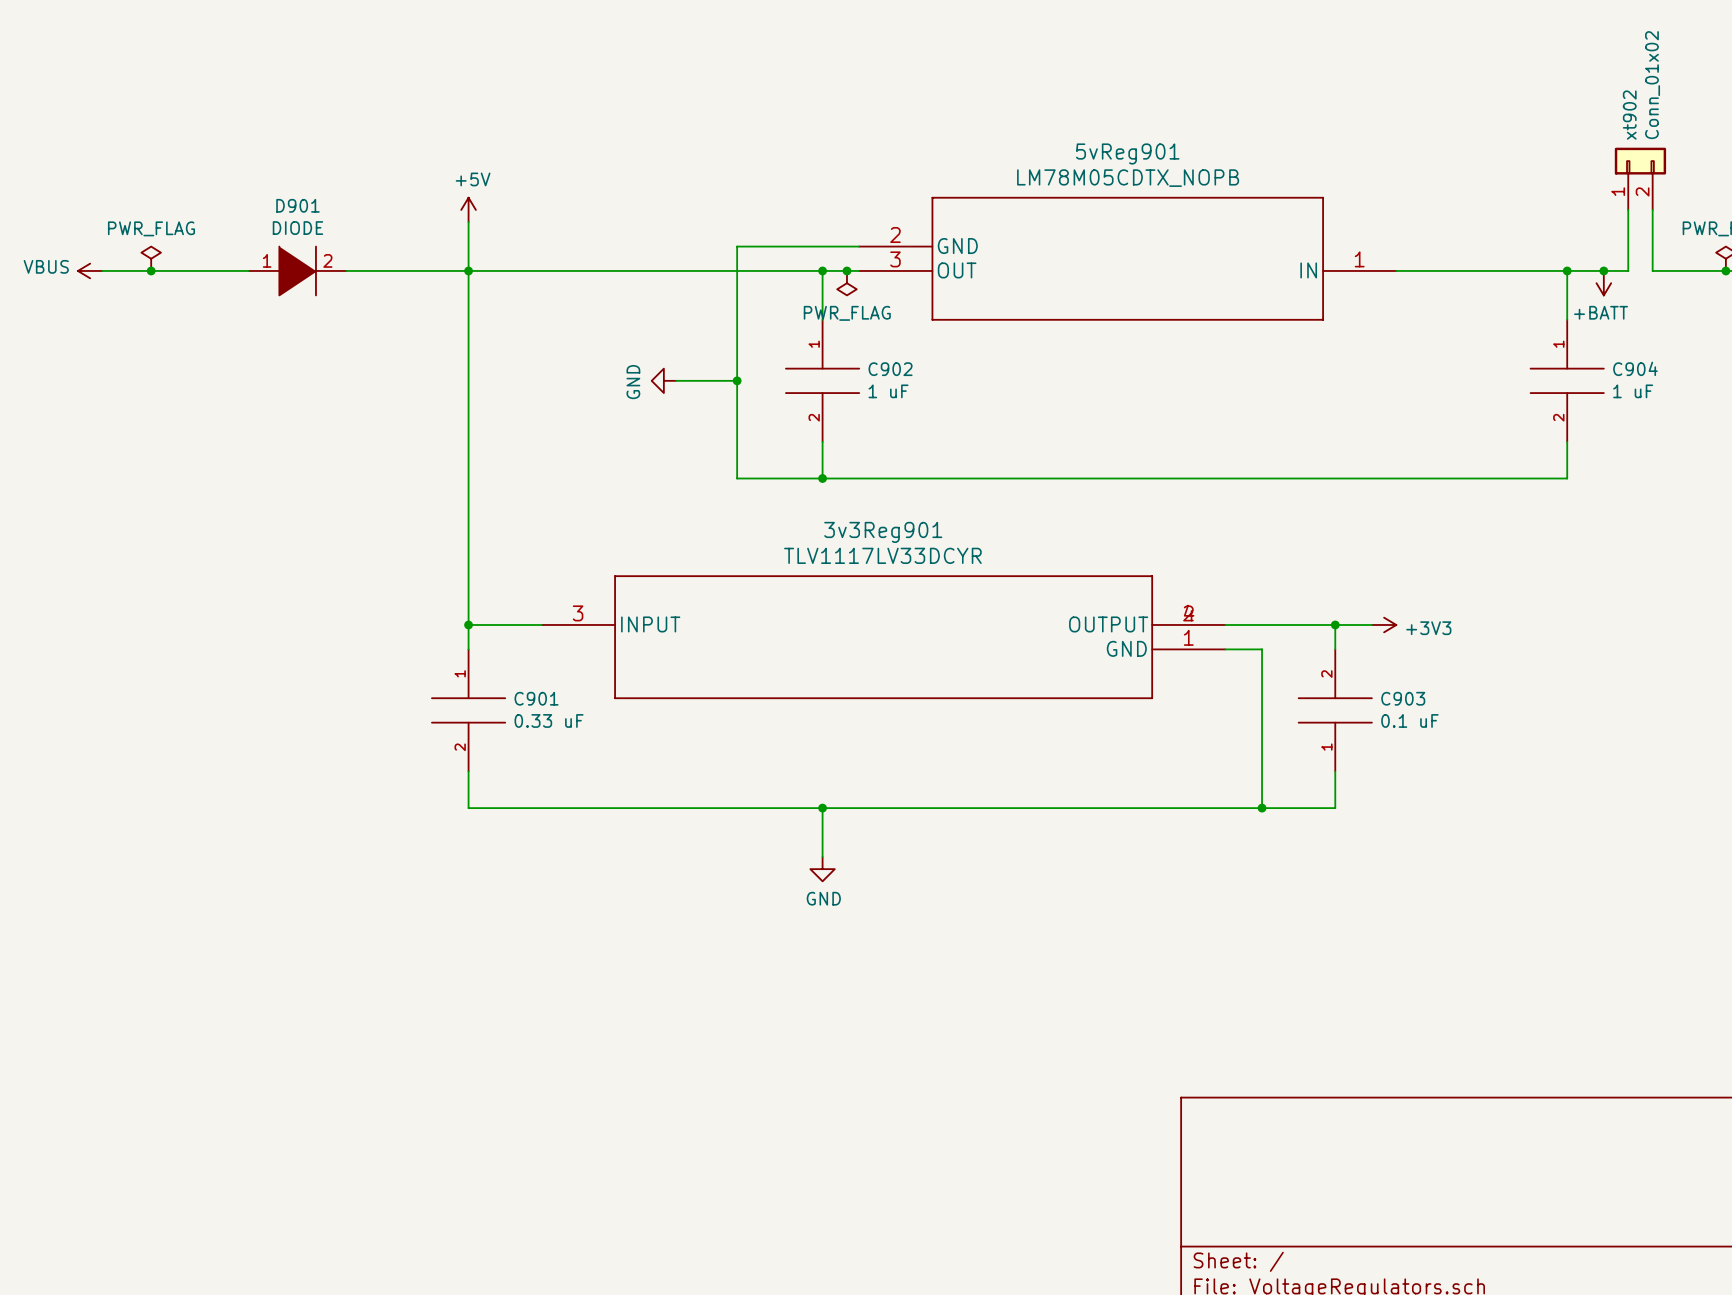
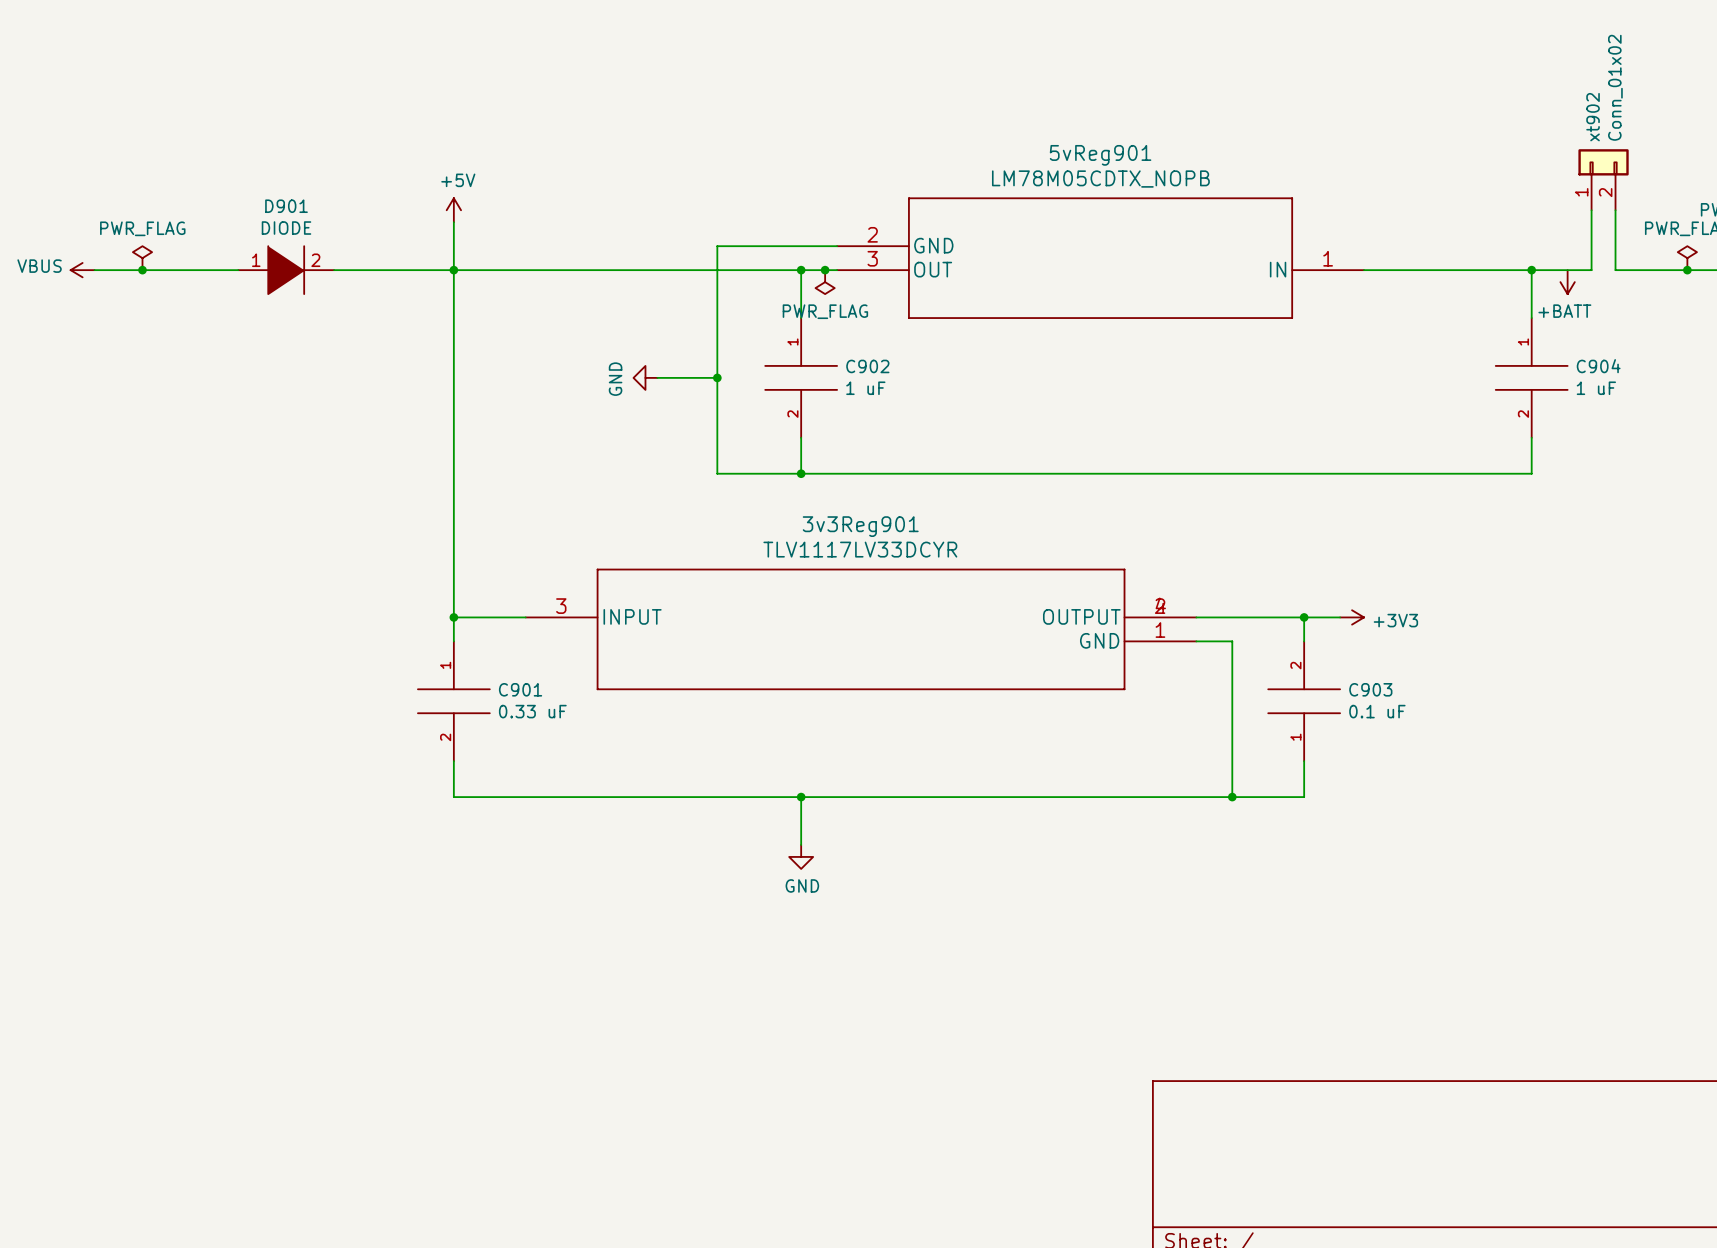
junction: (1603, 270) -> none

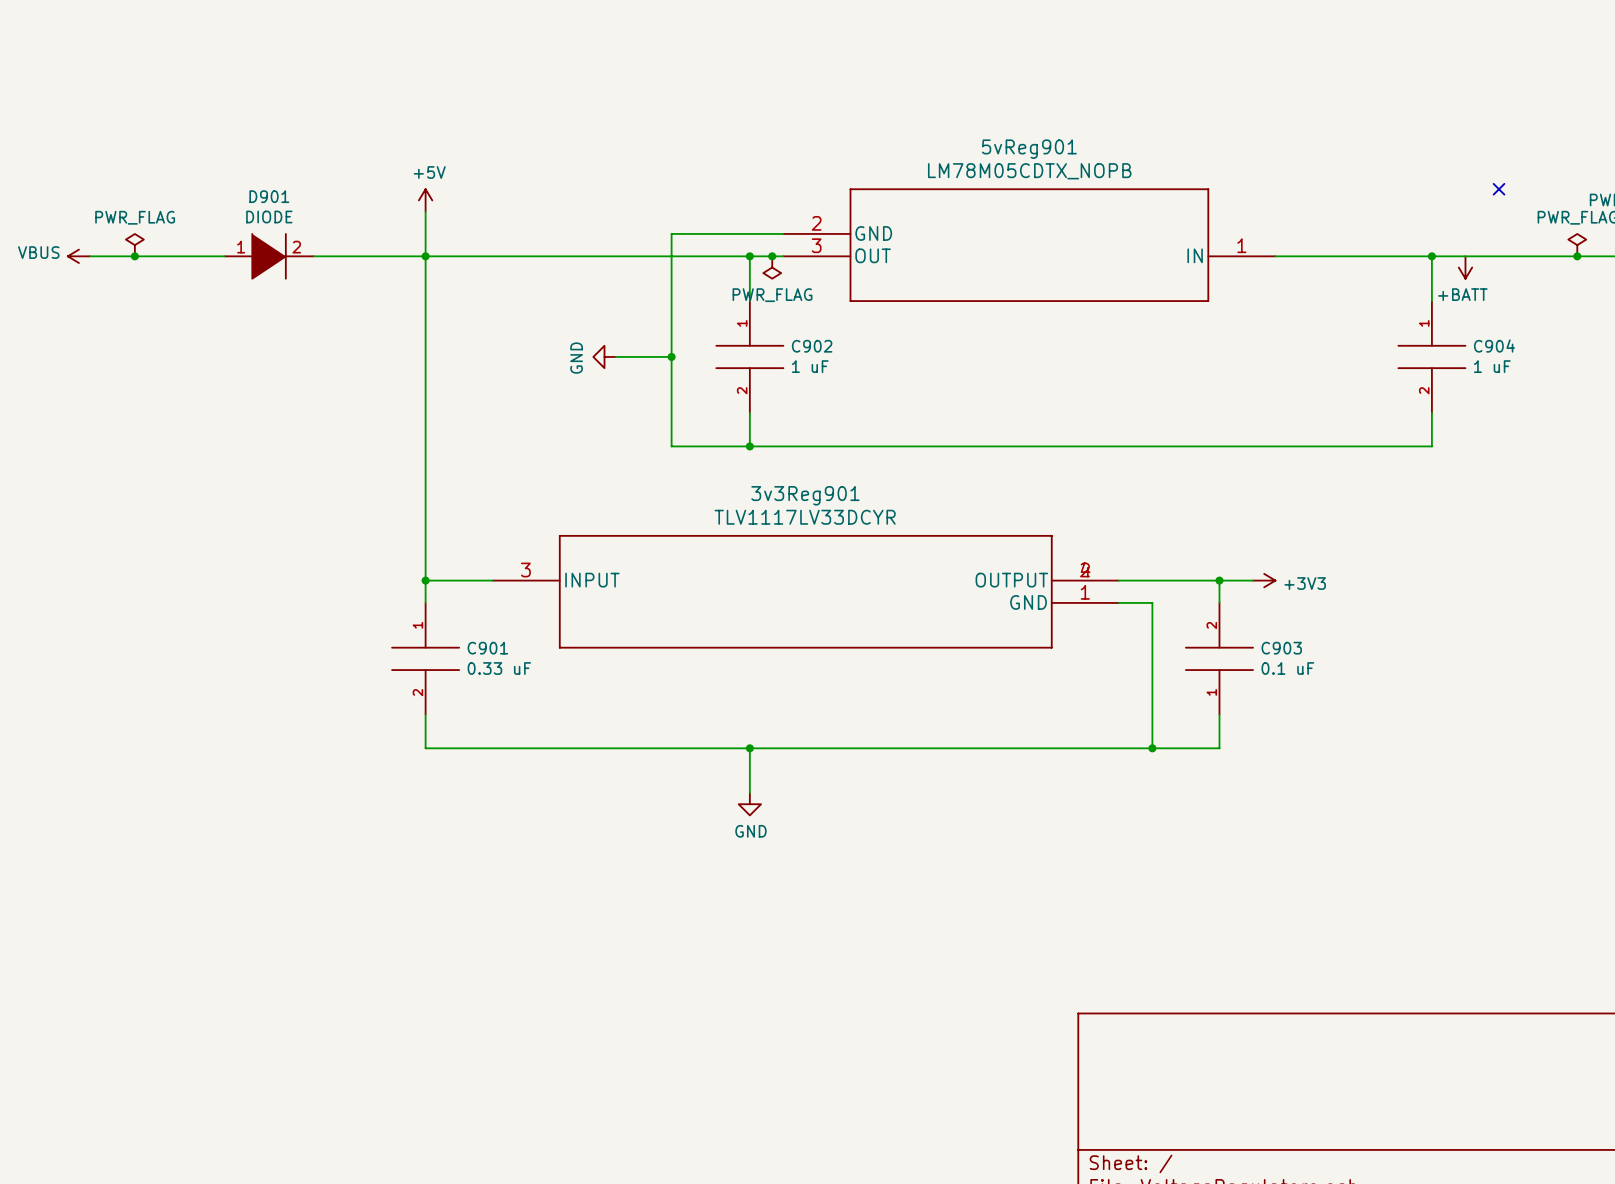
xt902: Conn_01x02 (1603, 179) -> none
no-connect mark: none -> (1499, 189)
wire: (1591, 210) (1591, 270) -> (1510, 256) (1487, 256)
wire: (1615, 210) (1615, 270) -> none

